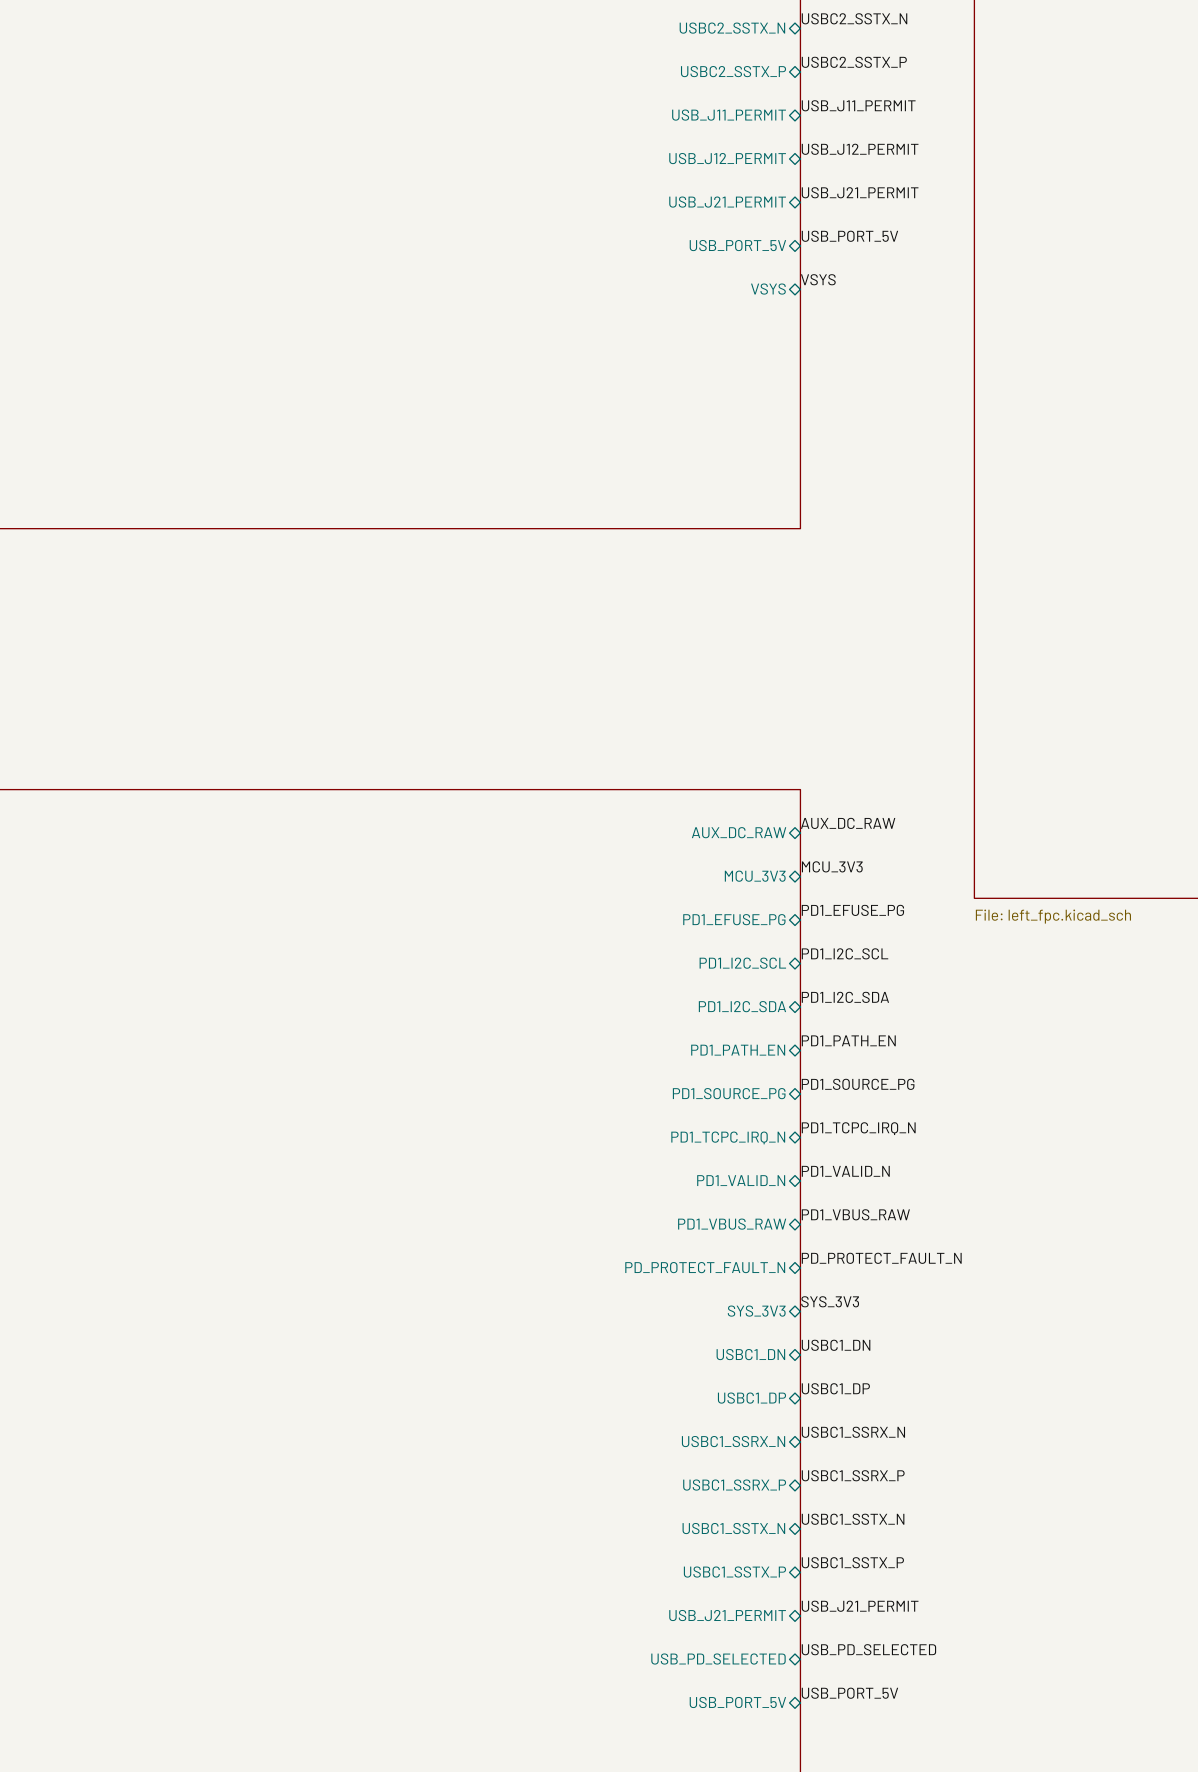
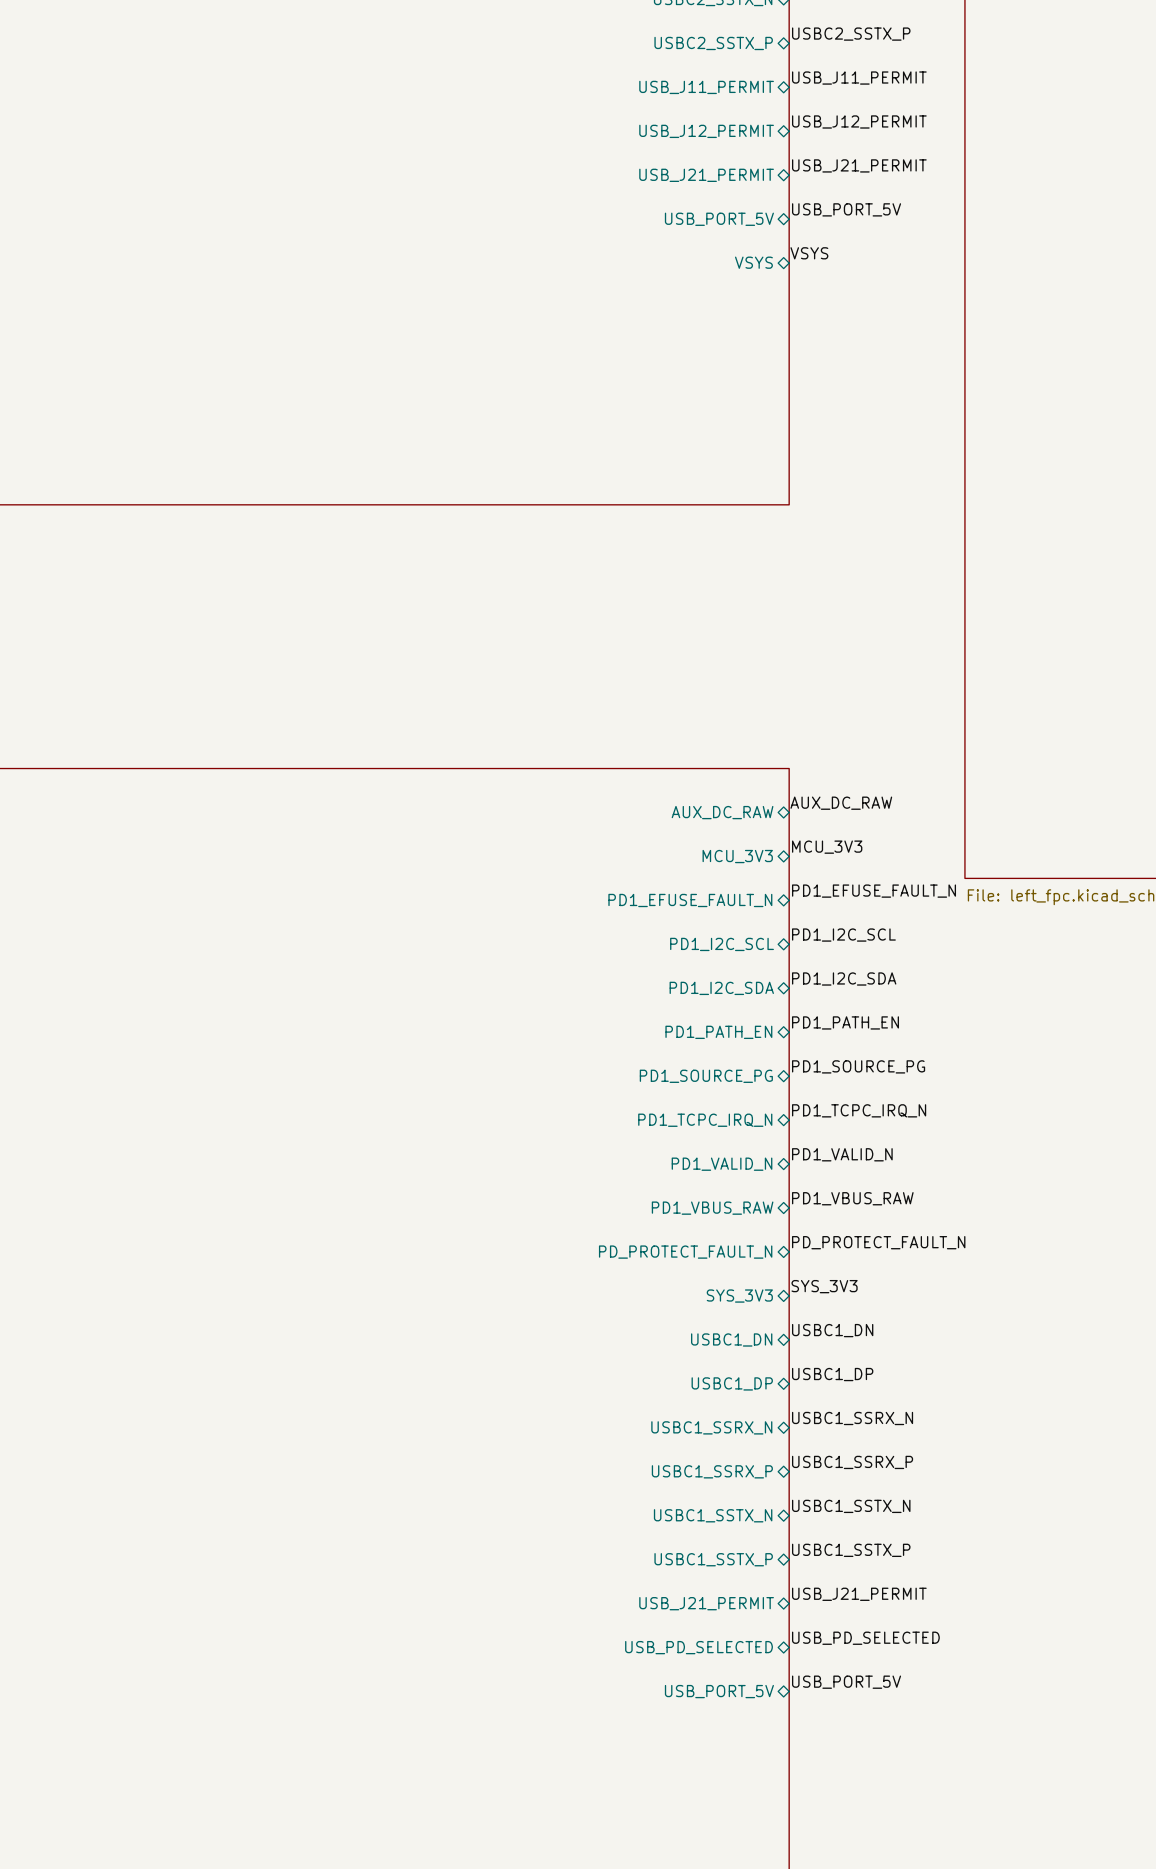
label: PD1_EFUSE_PG (852, 910) -> PD1_EFUSE_FAULT_N (874, 891)
sheet pin: PD1_EFUSE_PG (734, 919) -> PD1_EFUSE_FAULT_N (690, 900)

